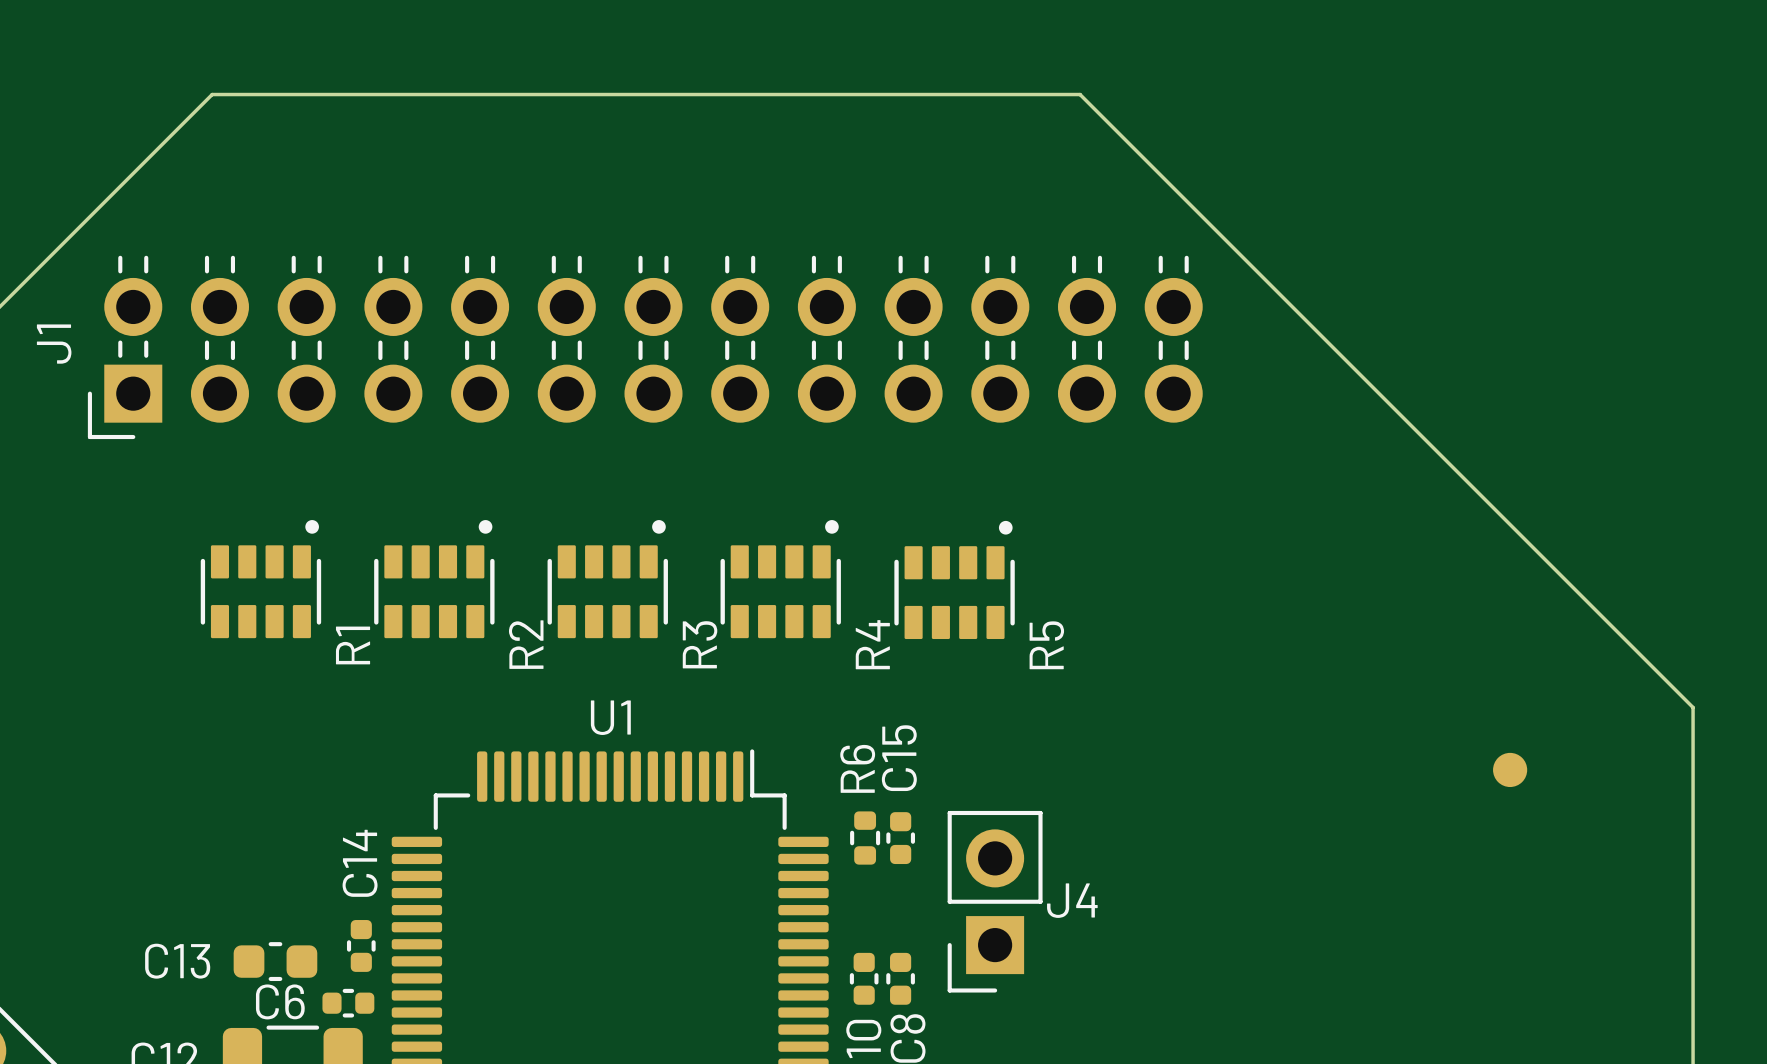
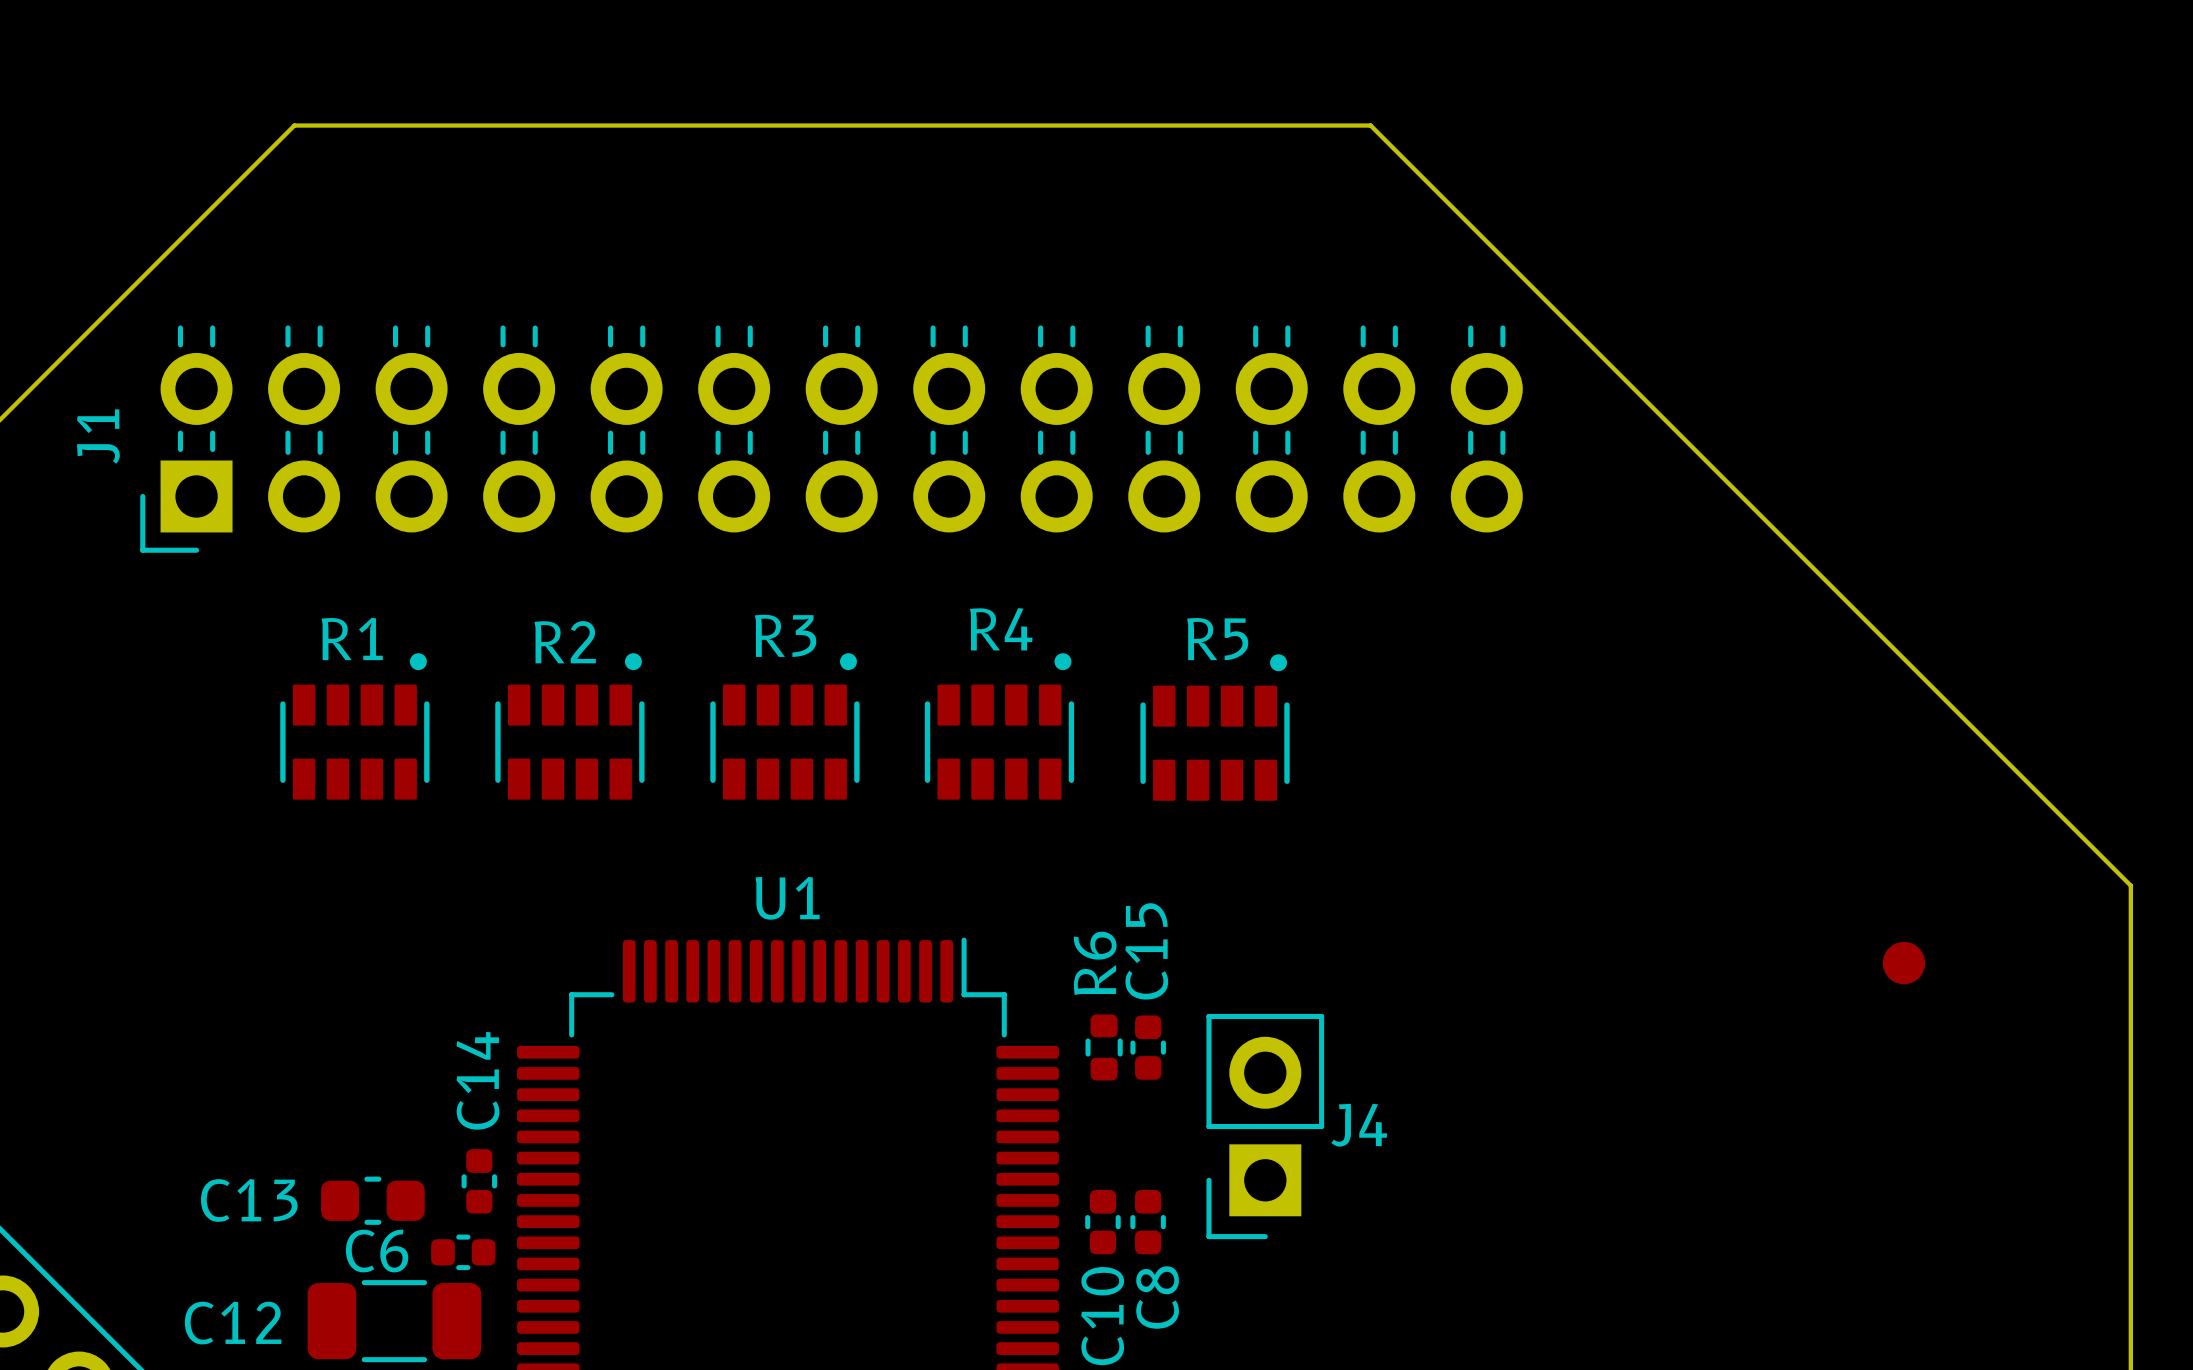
R2 name rotation: 0° (526, 644) -> 90° clockwise (565, 642)
R2 name position: R2 (526, 644) -> R2 (565, 642)
R3 name rotation: 0° (700, 644) -> 90° clockwise (785, 635)
R3 name position: R3 (700, 644) -> R3 (785, 635)
R4 name rotation: 0° (872, 644) -> 90° clockwise (1001, 629)
R4 name position: R4 (872, 644) -> R4 (1001, 629)
R1 name rotation: 0° (353, 645) -> 90° clockwise (352, 638)
R1 name position: R1 (353, 645) -> R1 (352, 638)
R5 name rotation: 0° (1046, 645) -> 90° clockwise (1217, 639)
R5 name position: R5 (1046, 645) -> R5 (1217, 639)

